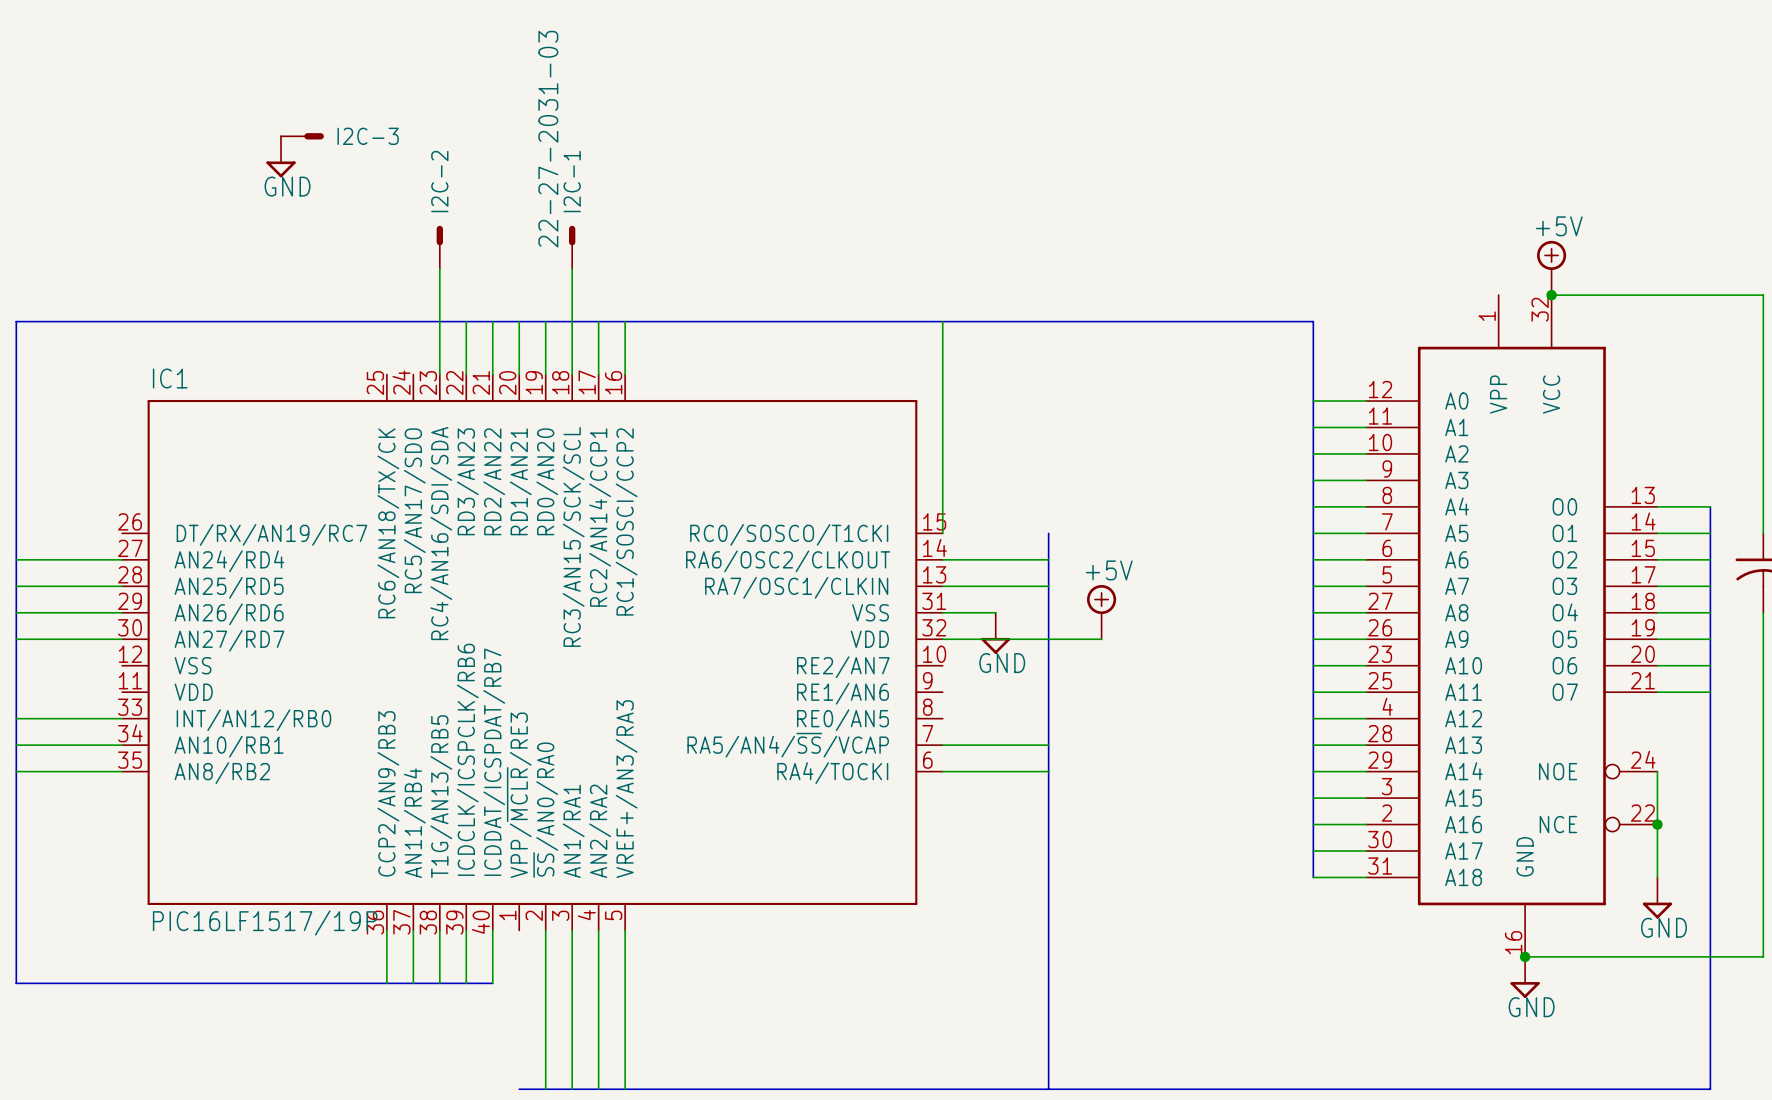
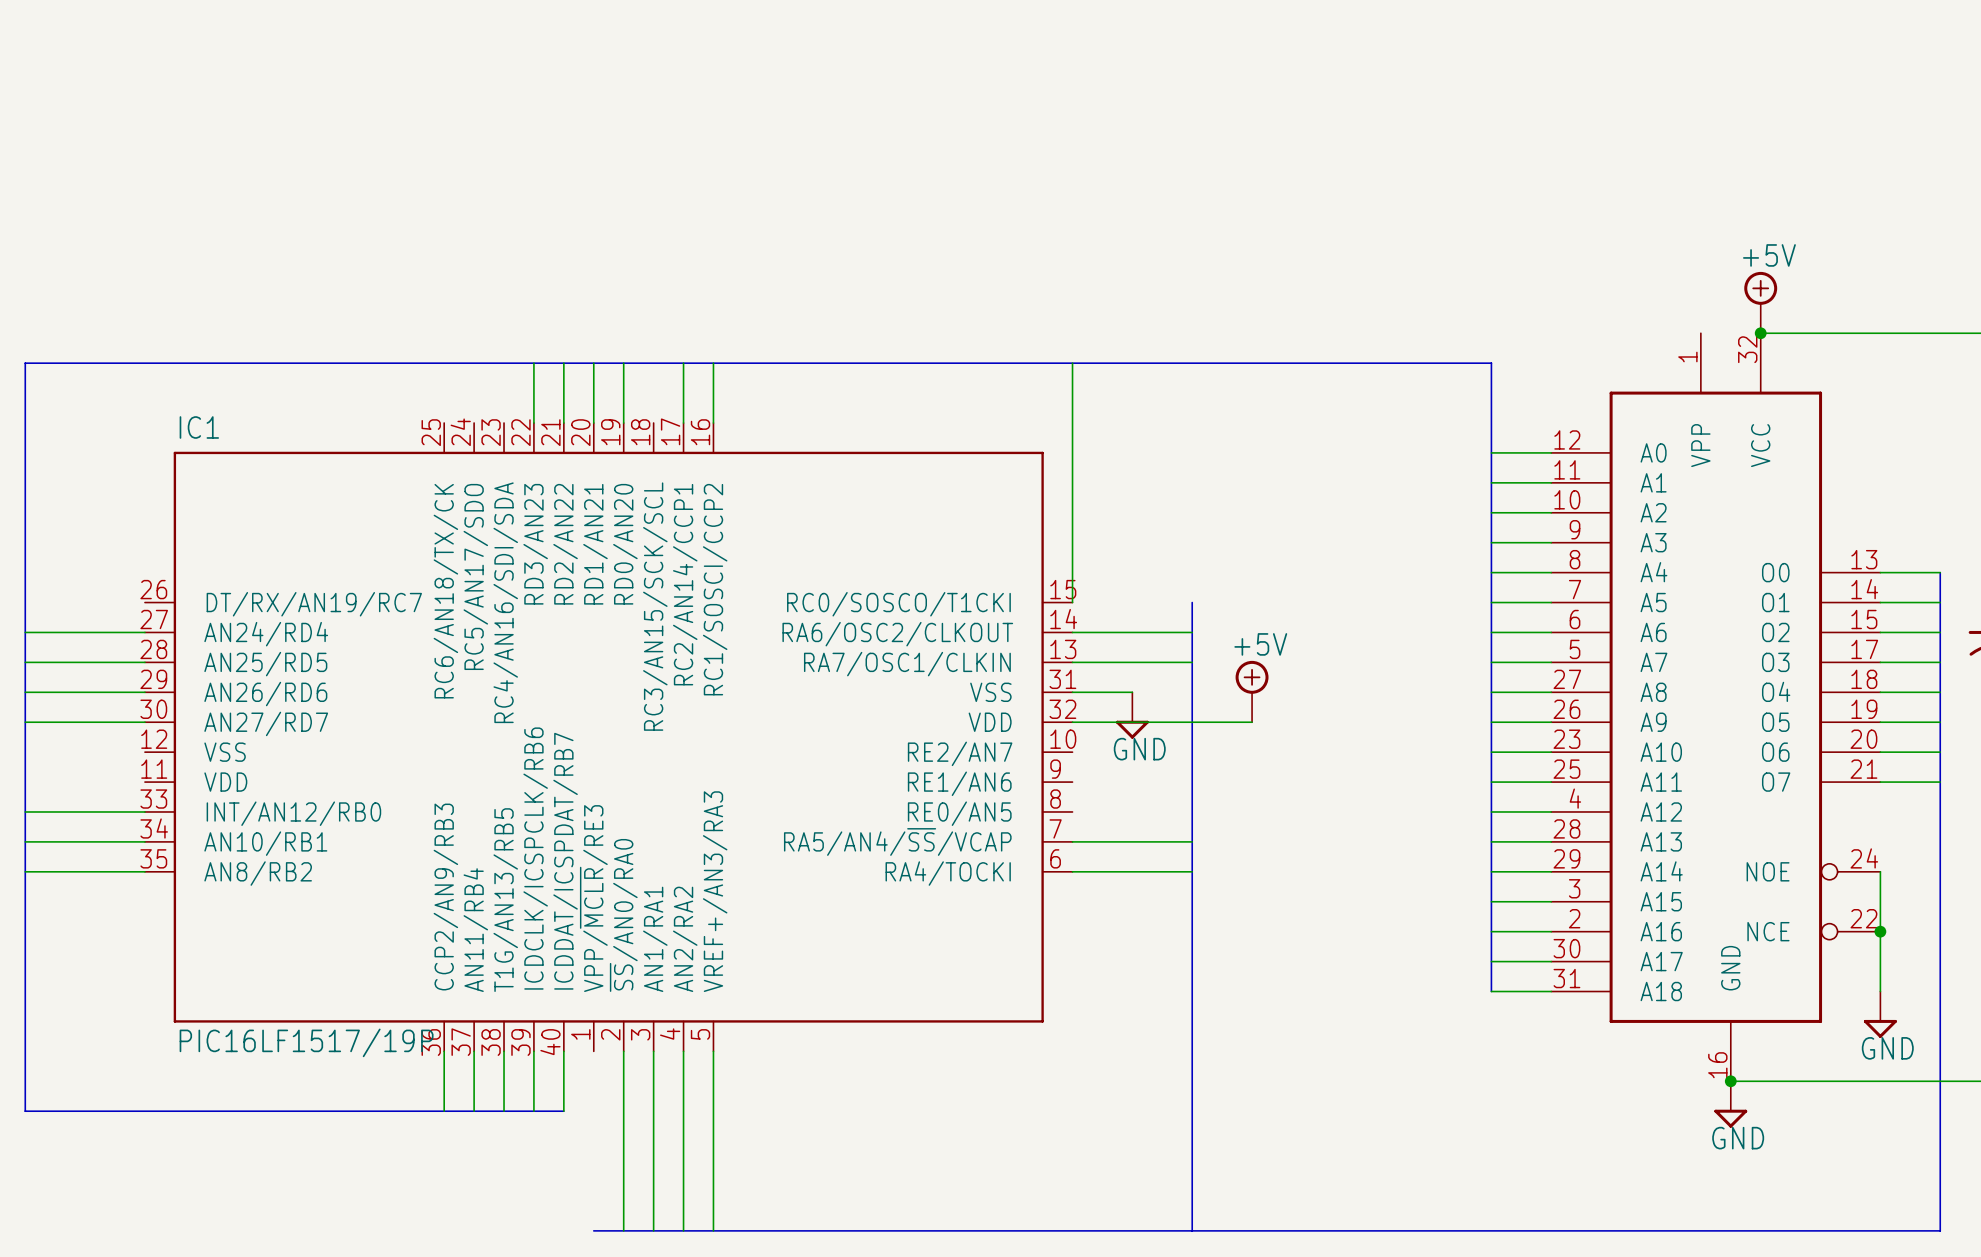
I2C-3: (302, 136) -> none
power symbol: GND (281, 156) -> none
I2C-2: (439, 247) -> none
I2C-1: 22-27-2031-03 (572, 247) -> none
wire: (439, 268) (439, 374) -> none
wire: (572, 268) (572, 374) -> none

